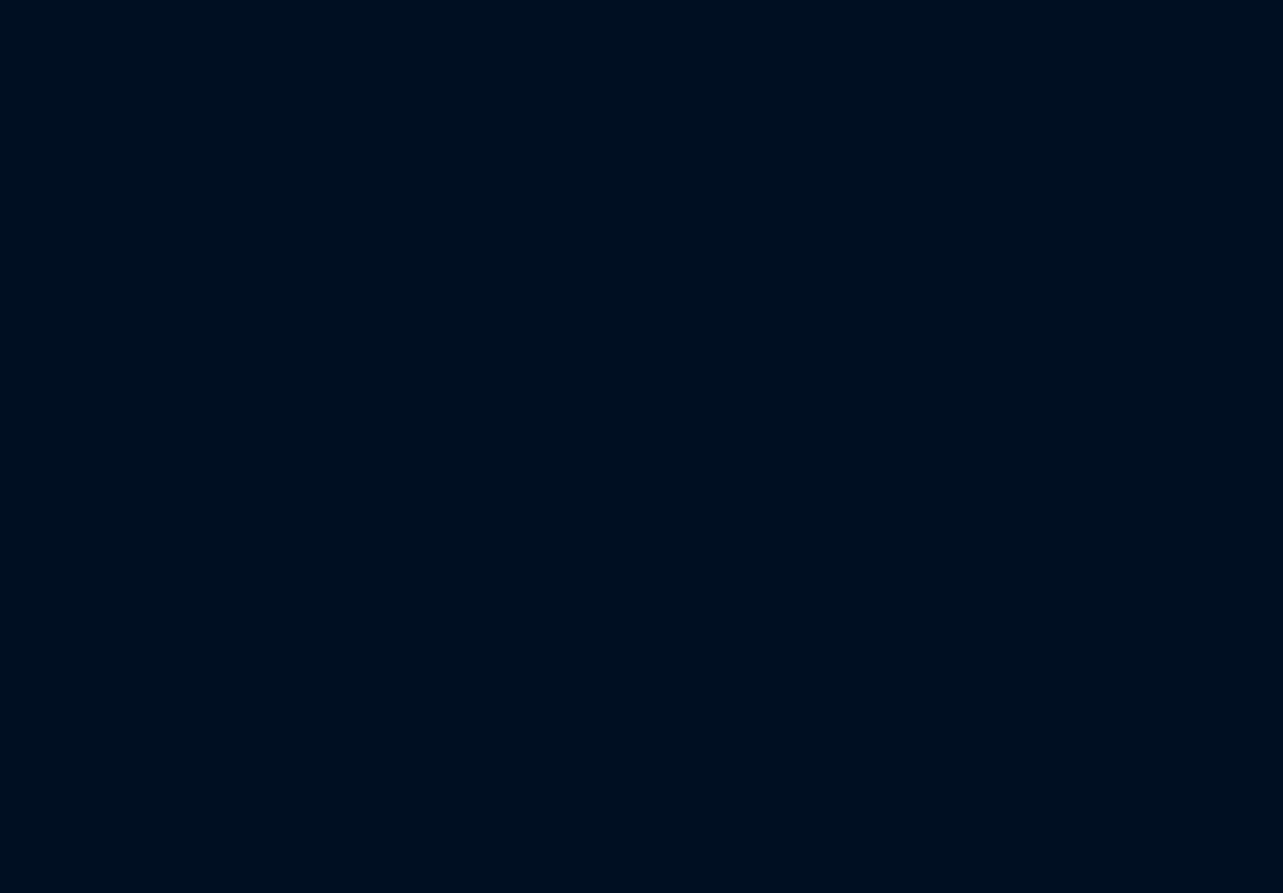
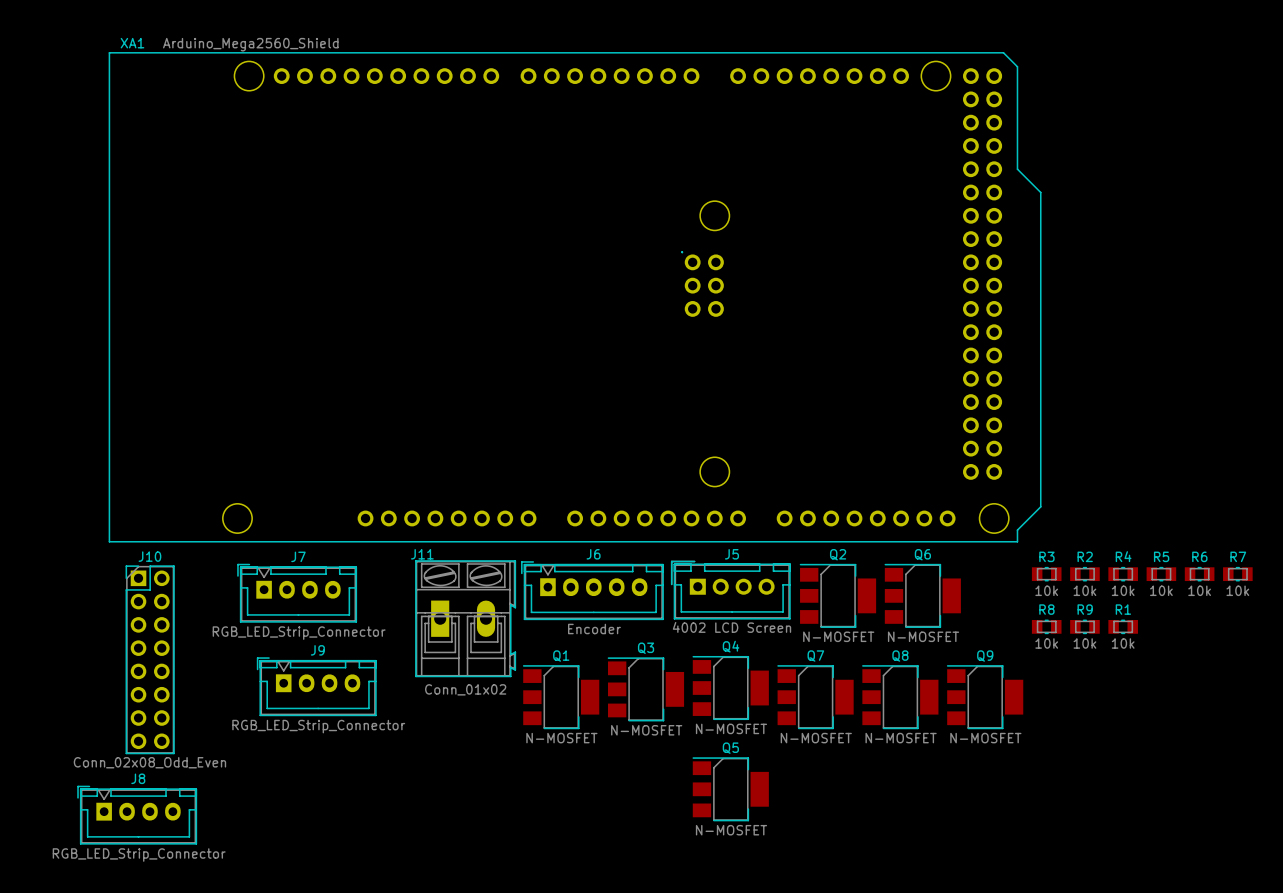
XA1: none -> Arduino_Mega2560_Shield (575, 297)
R3: none -> 10k (1046, 574)
R2: none -> 10k (1084, 574)
R4: none -> 10k (1123, 574)
R5: none -> 10k (1161, 574)
R6: none -> 10k (1199, 574)
R7: none -> 10k (1237, 574)
J6: none -> Encoder (592, 590)
J5: none -> 4002 LCD Screen (730, 590)
J7: none -> RGB_LED_Strip_Connector (297, 593)
Q2: none -> N-MOSFET (838, 595)
Q6: none -> N-MOSFET (922, 595)
J11: none -> Conn_01x02 (465, 618)
R8: none -> 10k (1046, 626)
R9: none -> 10k (1084, 626)
R1: none -> 10k (1123, 626)
J10: none -> Conn_02x08_Odd_Even (150, 659)
J9: none -> RGB_LED_Strip_Connector (316, 686)
Q4: none -> N-MOSFET (730, 688)
Q3: none -> N-MOSFET (645, 689)
Q1: none -> N-MOSFET (561, 697)
Q7: none -> N-MOSFET (815, 697)
Q8: none -> N-MOSFET (900, 697)
Q9: none -> N-MOSFET (985, 697)
Q5: none -> N-MOSFET (730, 789)
J8: none -> RGB_LED_Strip_Connector (137, 815)

